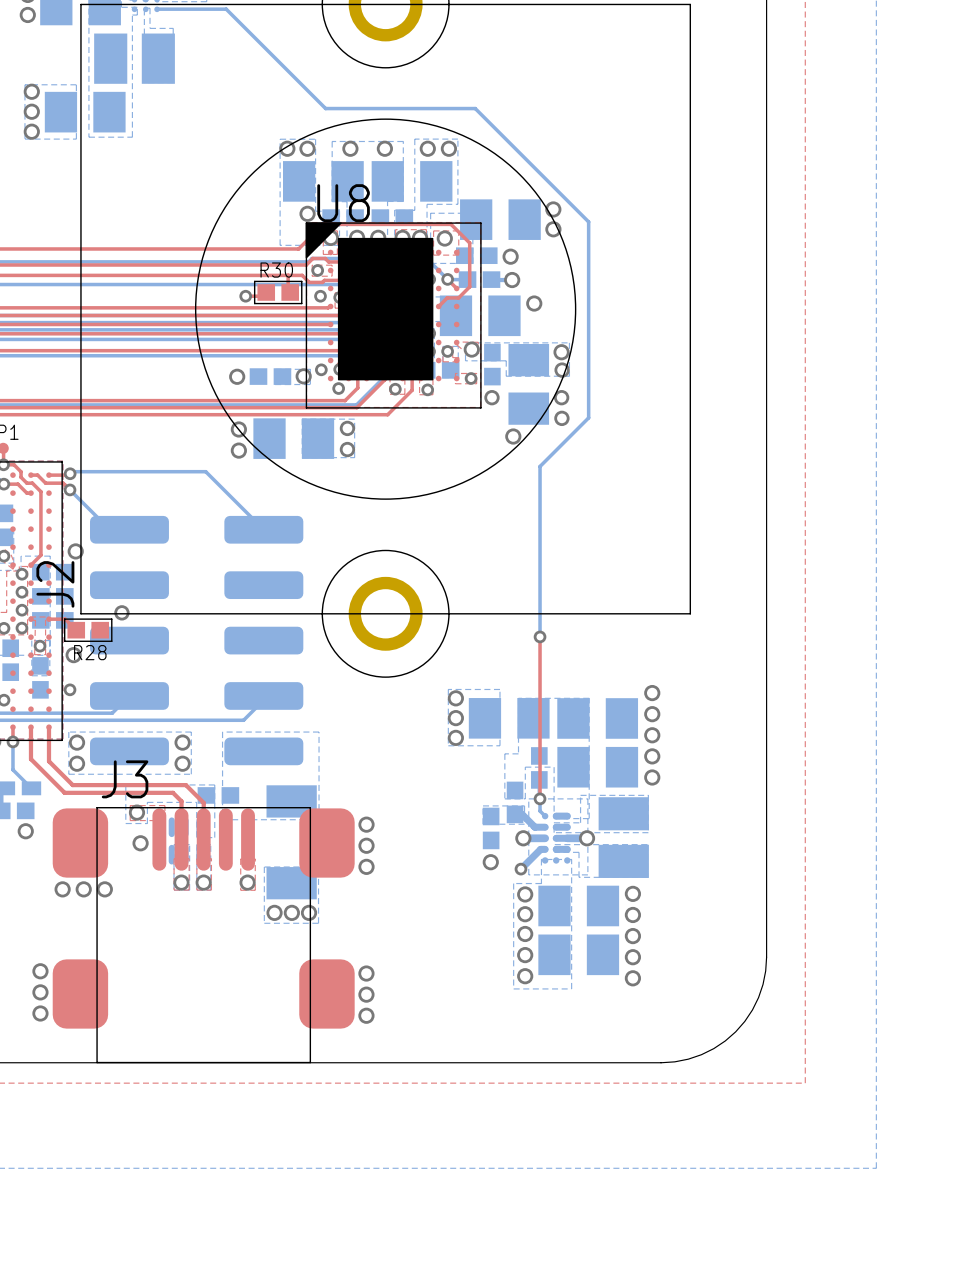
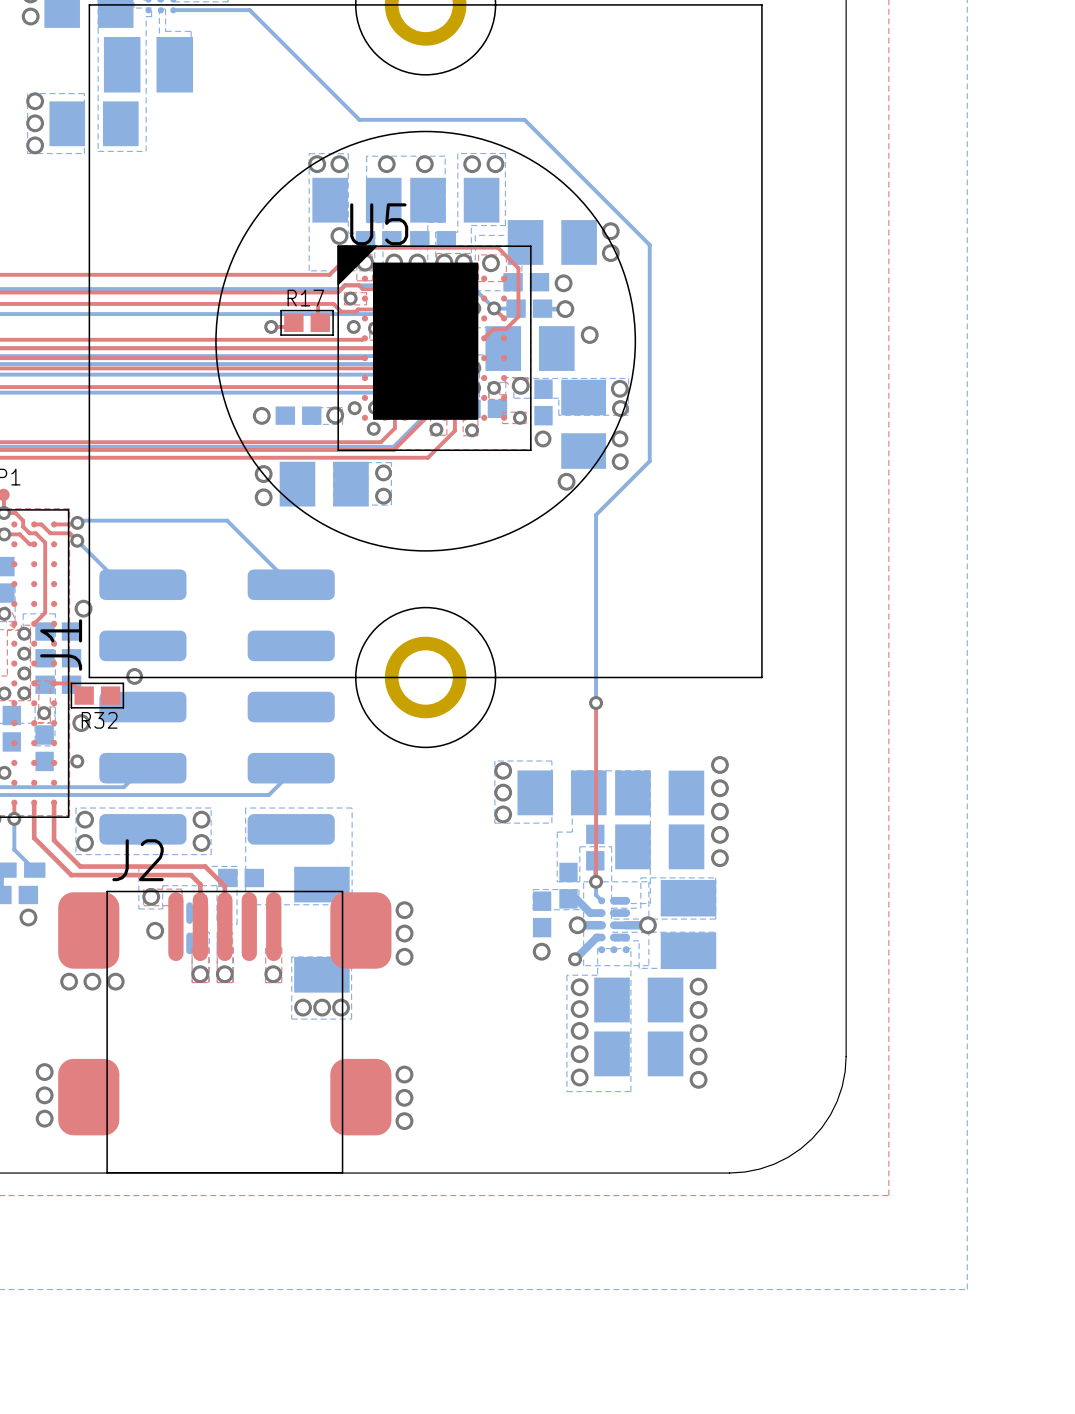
U8 name: U8 (343, 203) -> U5 (379, 224)
R30 name: R30 (276, 270) -> R17 (305, 298)
J2 name: J2 (55, 584) -> J1 (61, 645)
R28 name: R28 (90, 652) -> R32 (99, 720)
J3 name: J3 (125, 779) -> J2 (138, 860)

